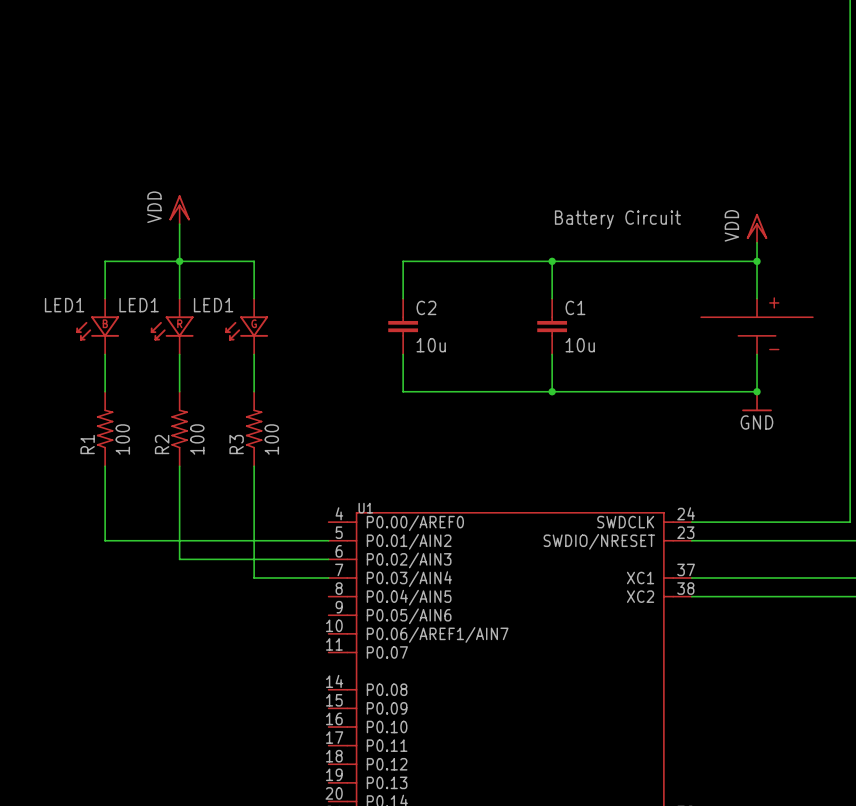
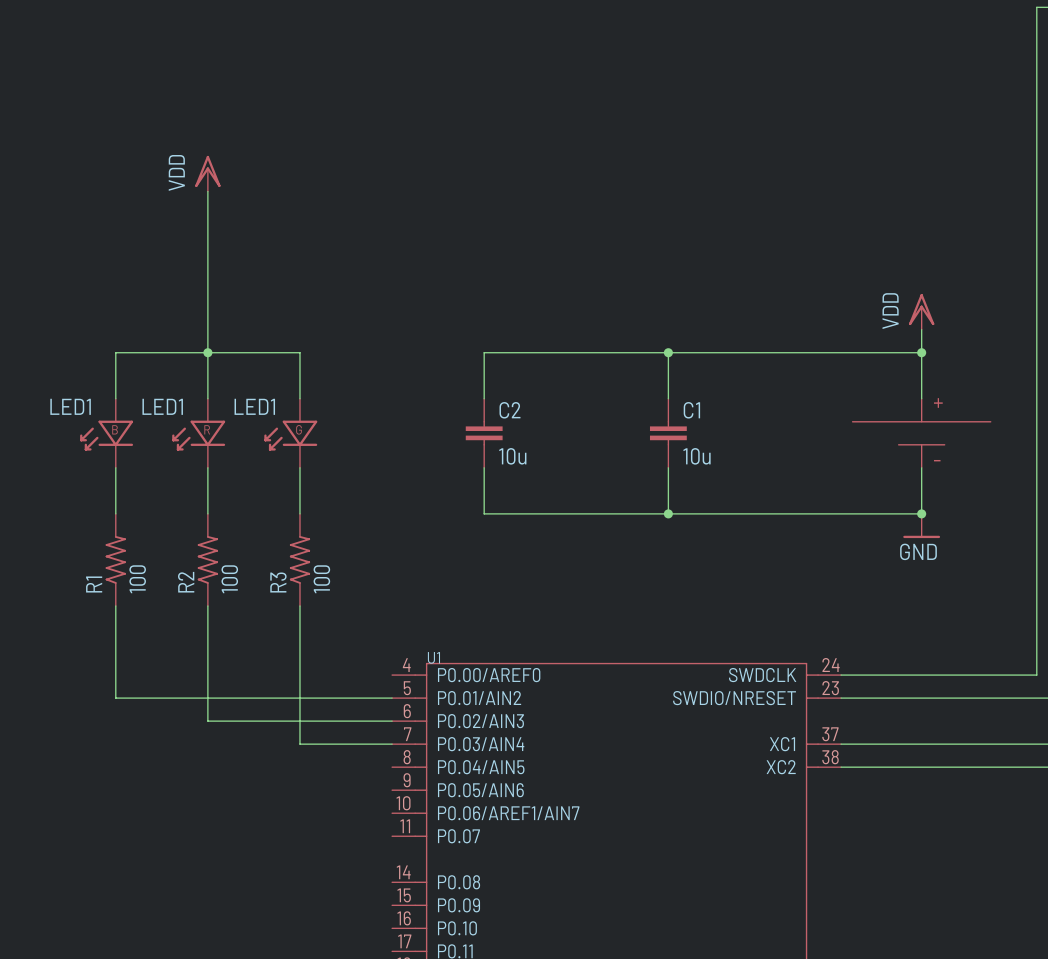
wire: none -> (207, 191) (207, 306)
power symbol position: VDD (179, 209) -> VDD (207, 173)
text: Battery Circuit (617, 219) -> none

